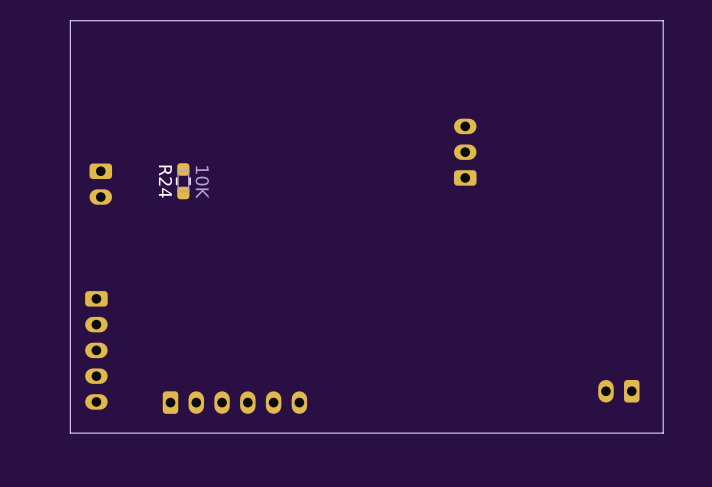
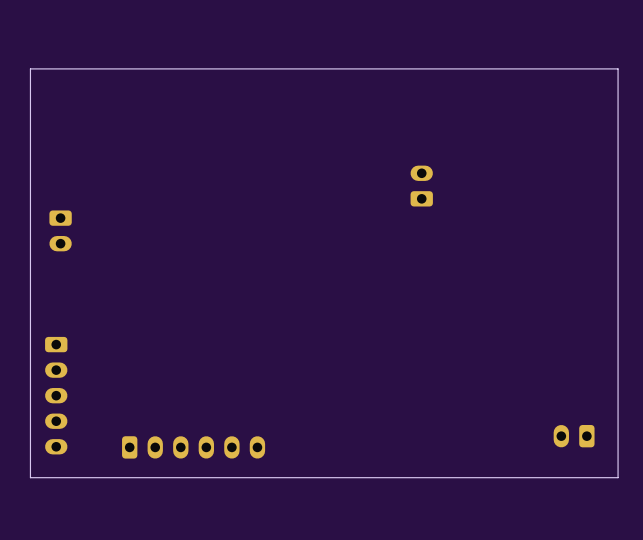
part: none -> (421, 186)
part: (465, 152) -> none
R24: 10K (183, 181) -> none

